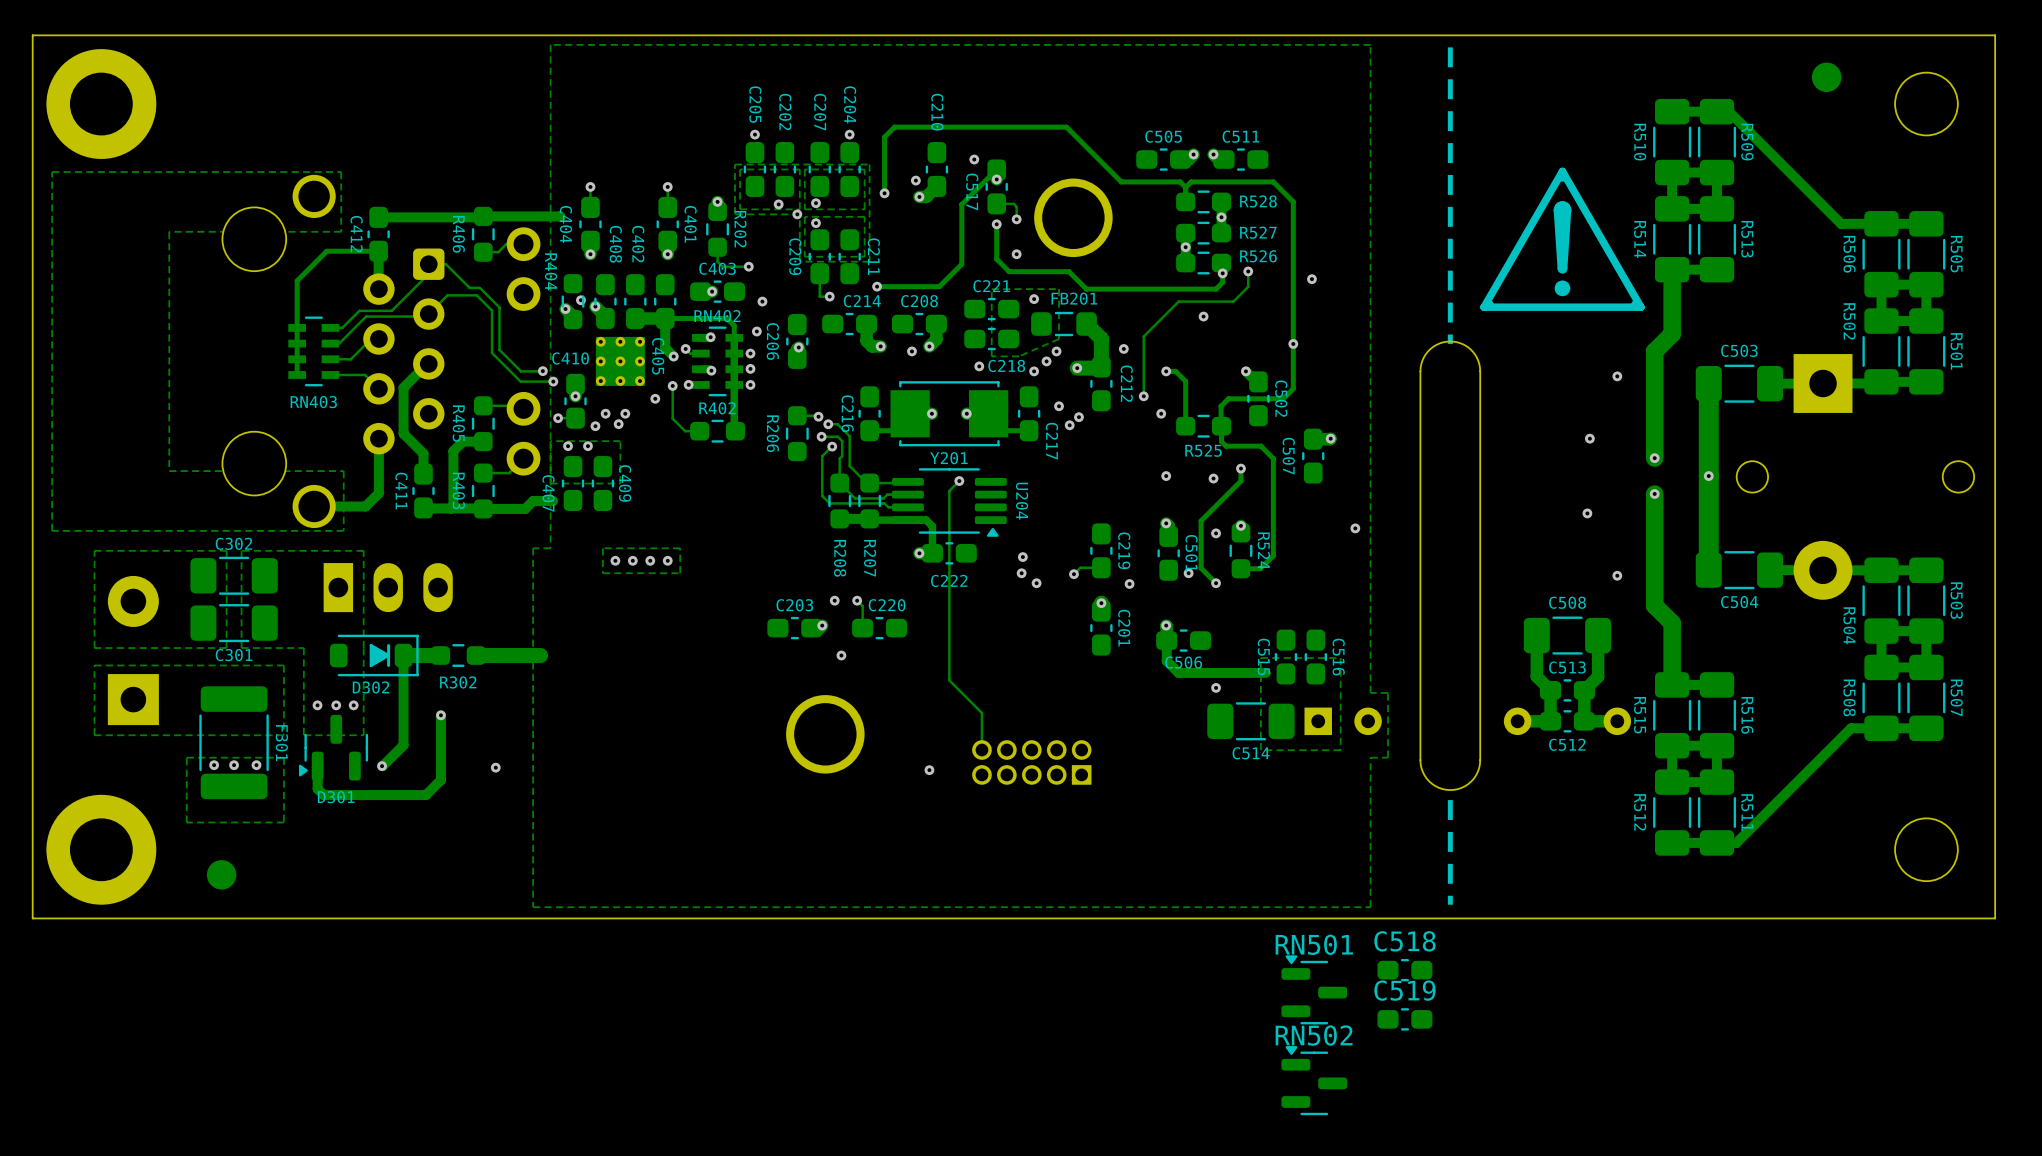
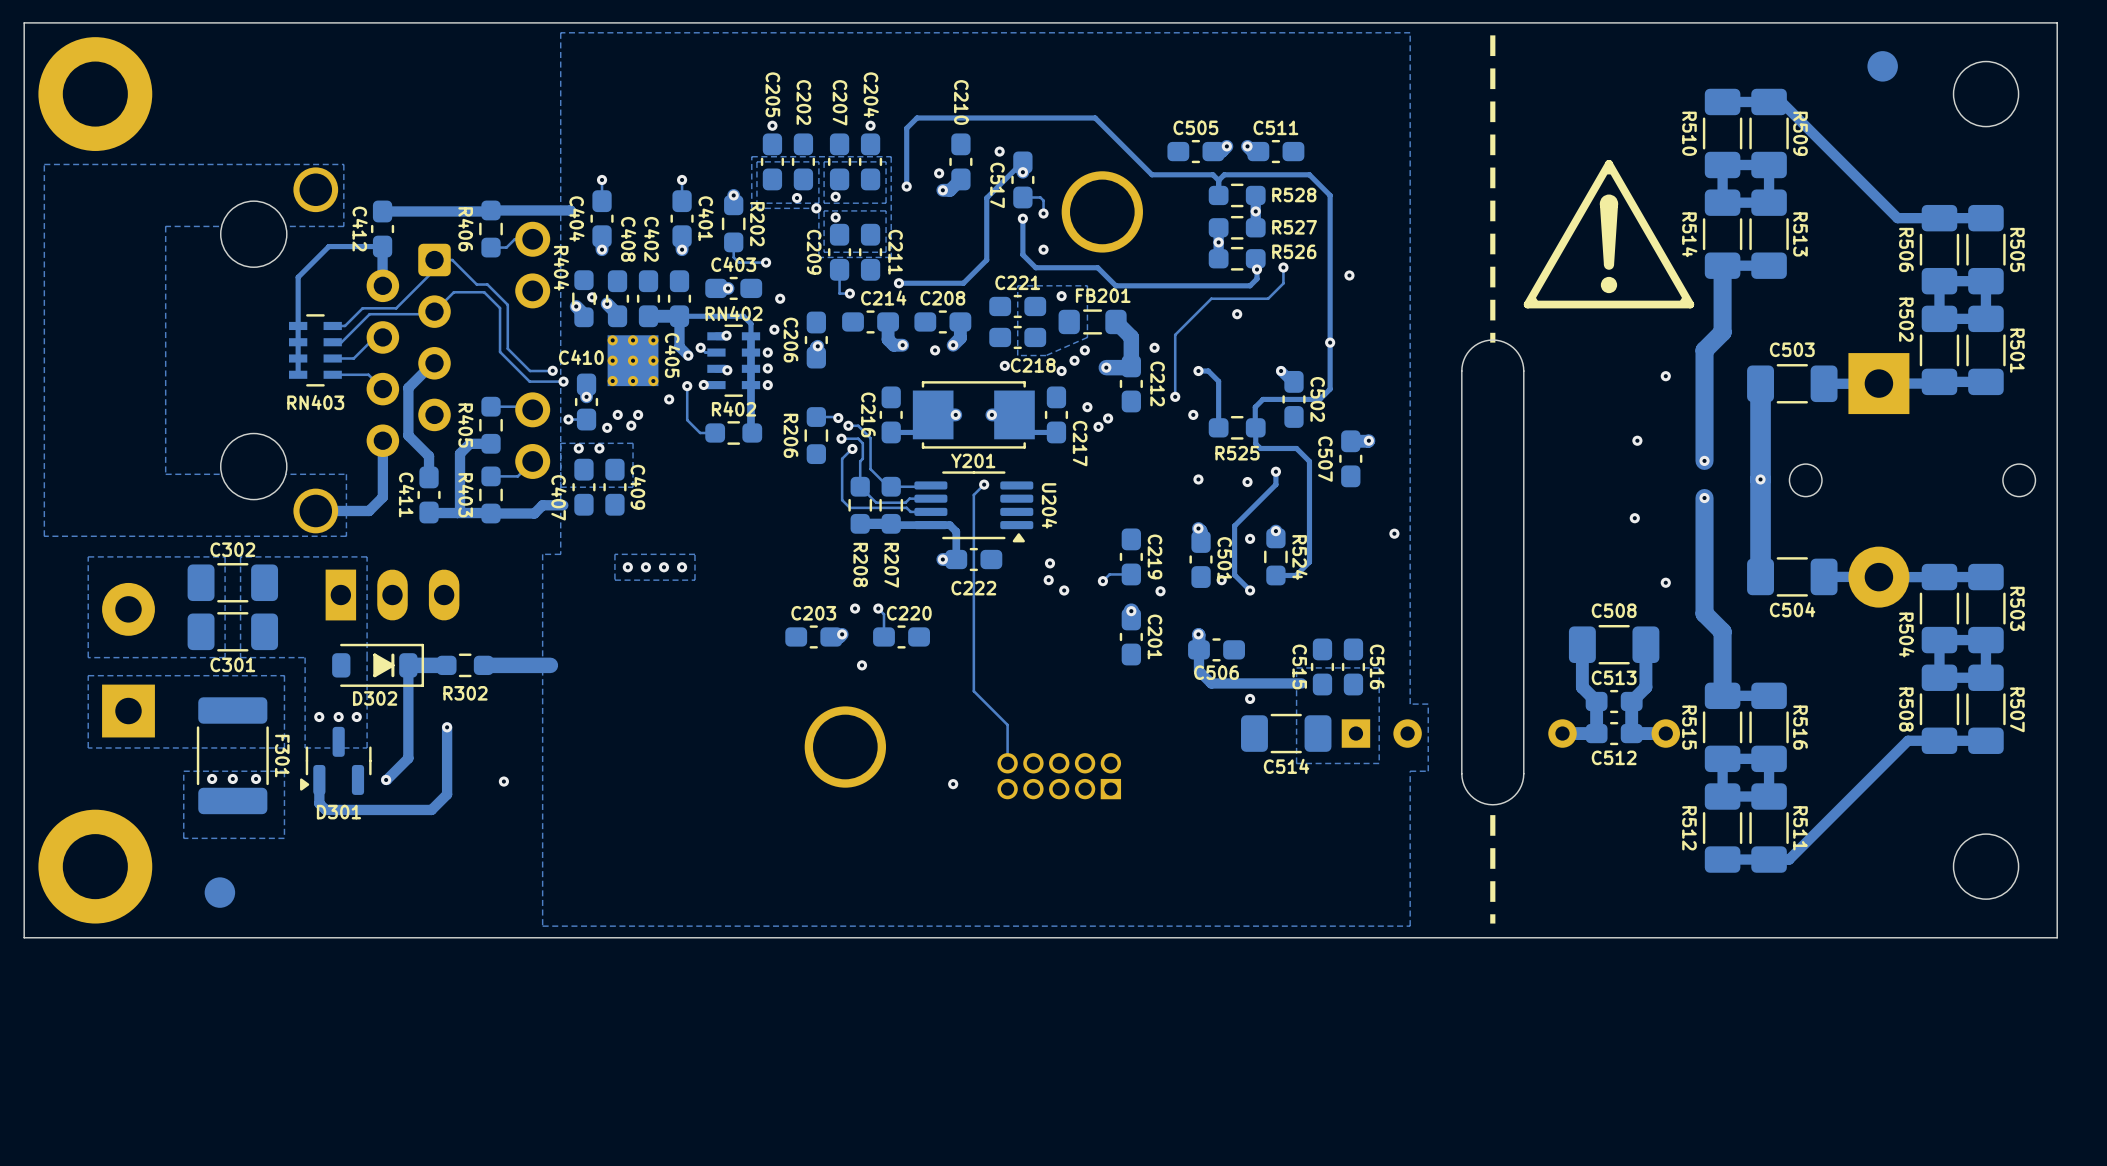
C518: (1404, 970) -> none
RN501: (1314, 989) -> none
C519: (1404, 1019) -> none
RN502: (1314, 1080) -> none

